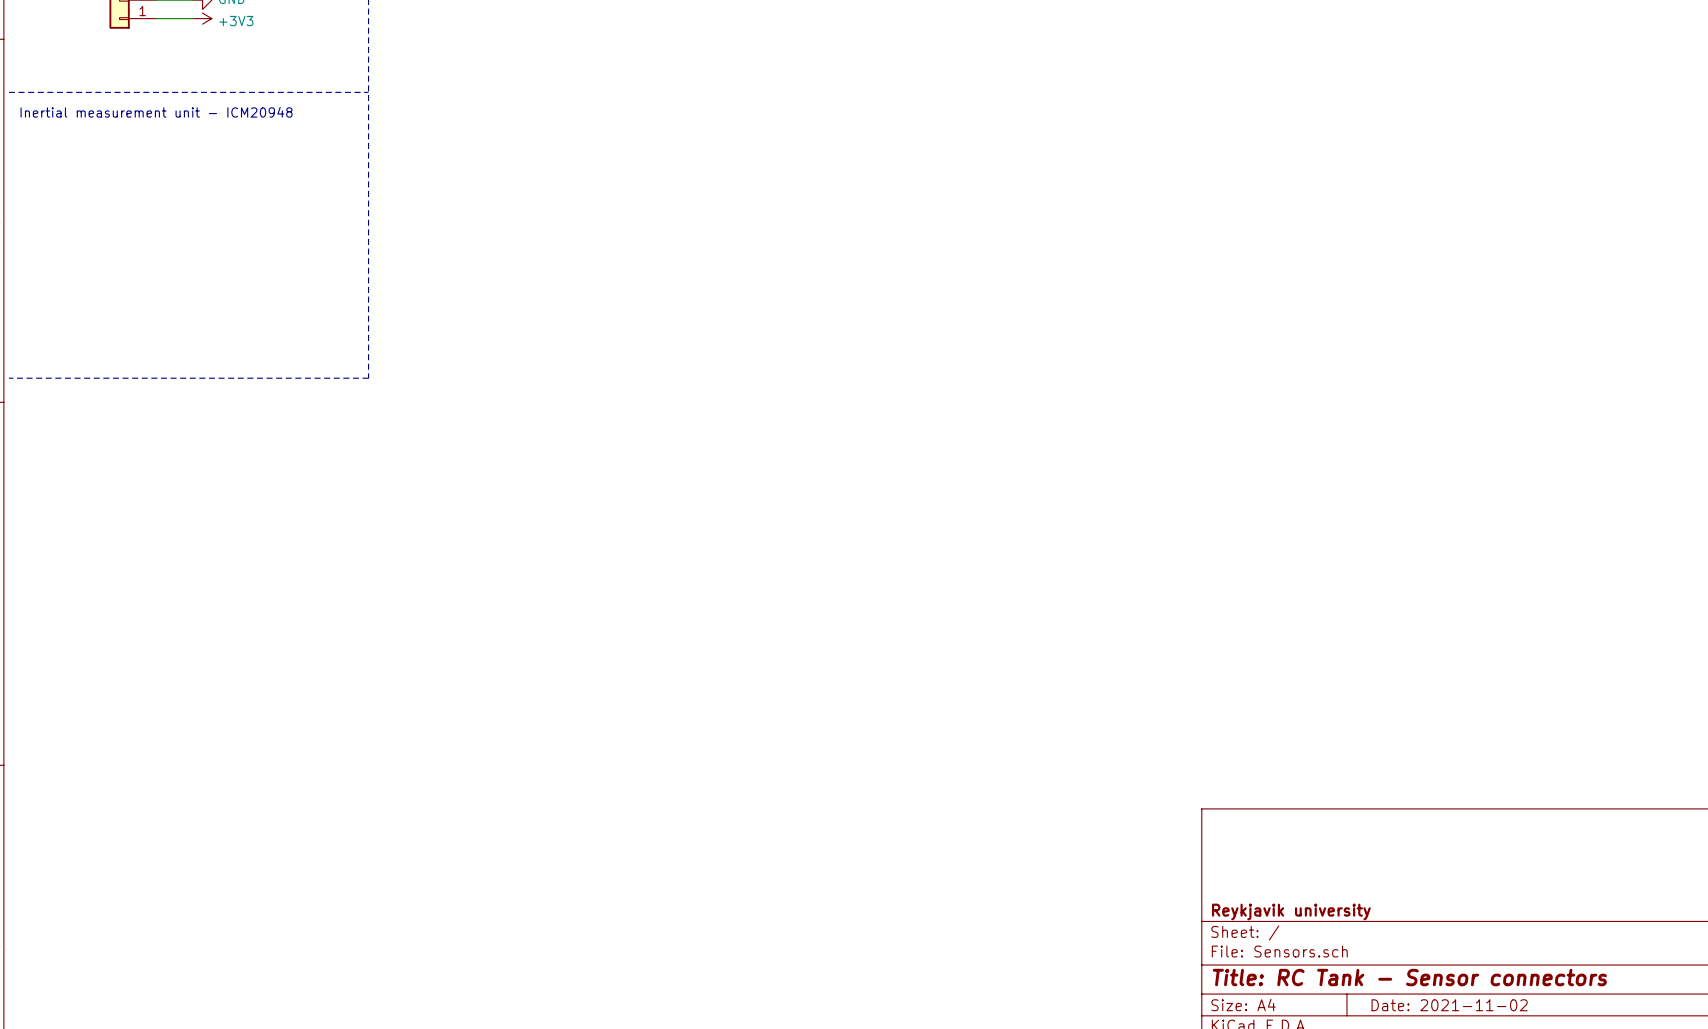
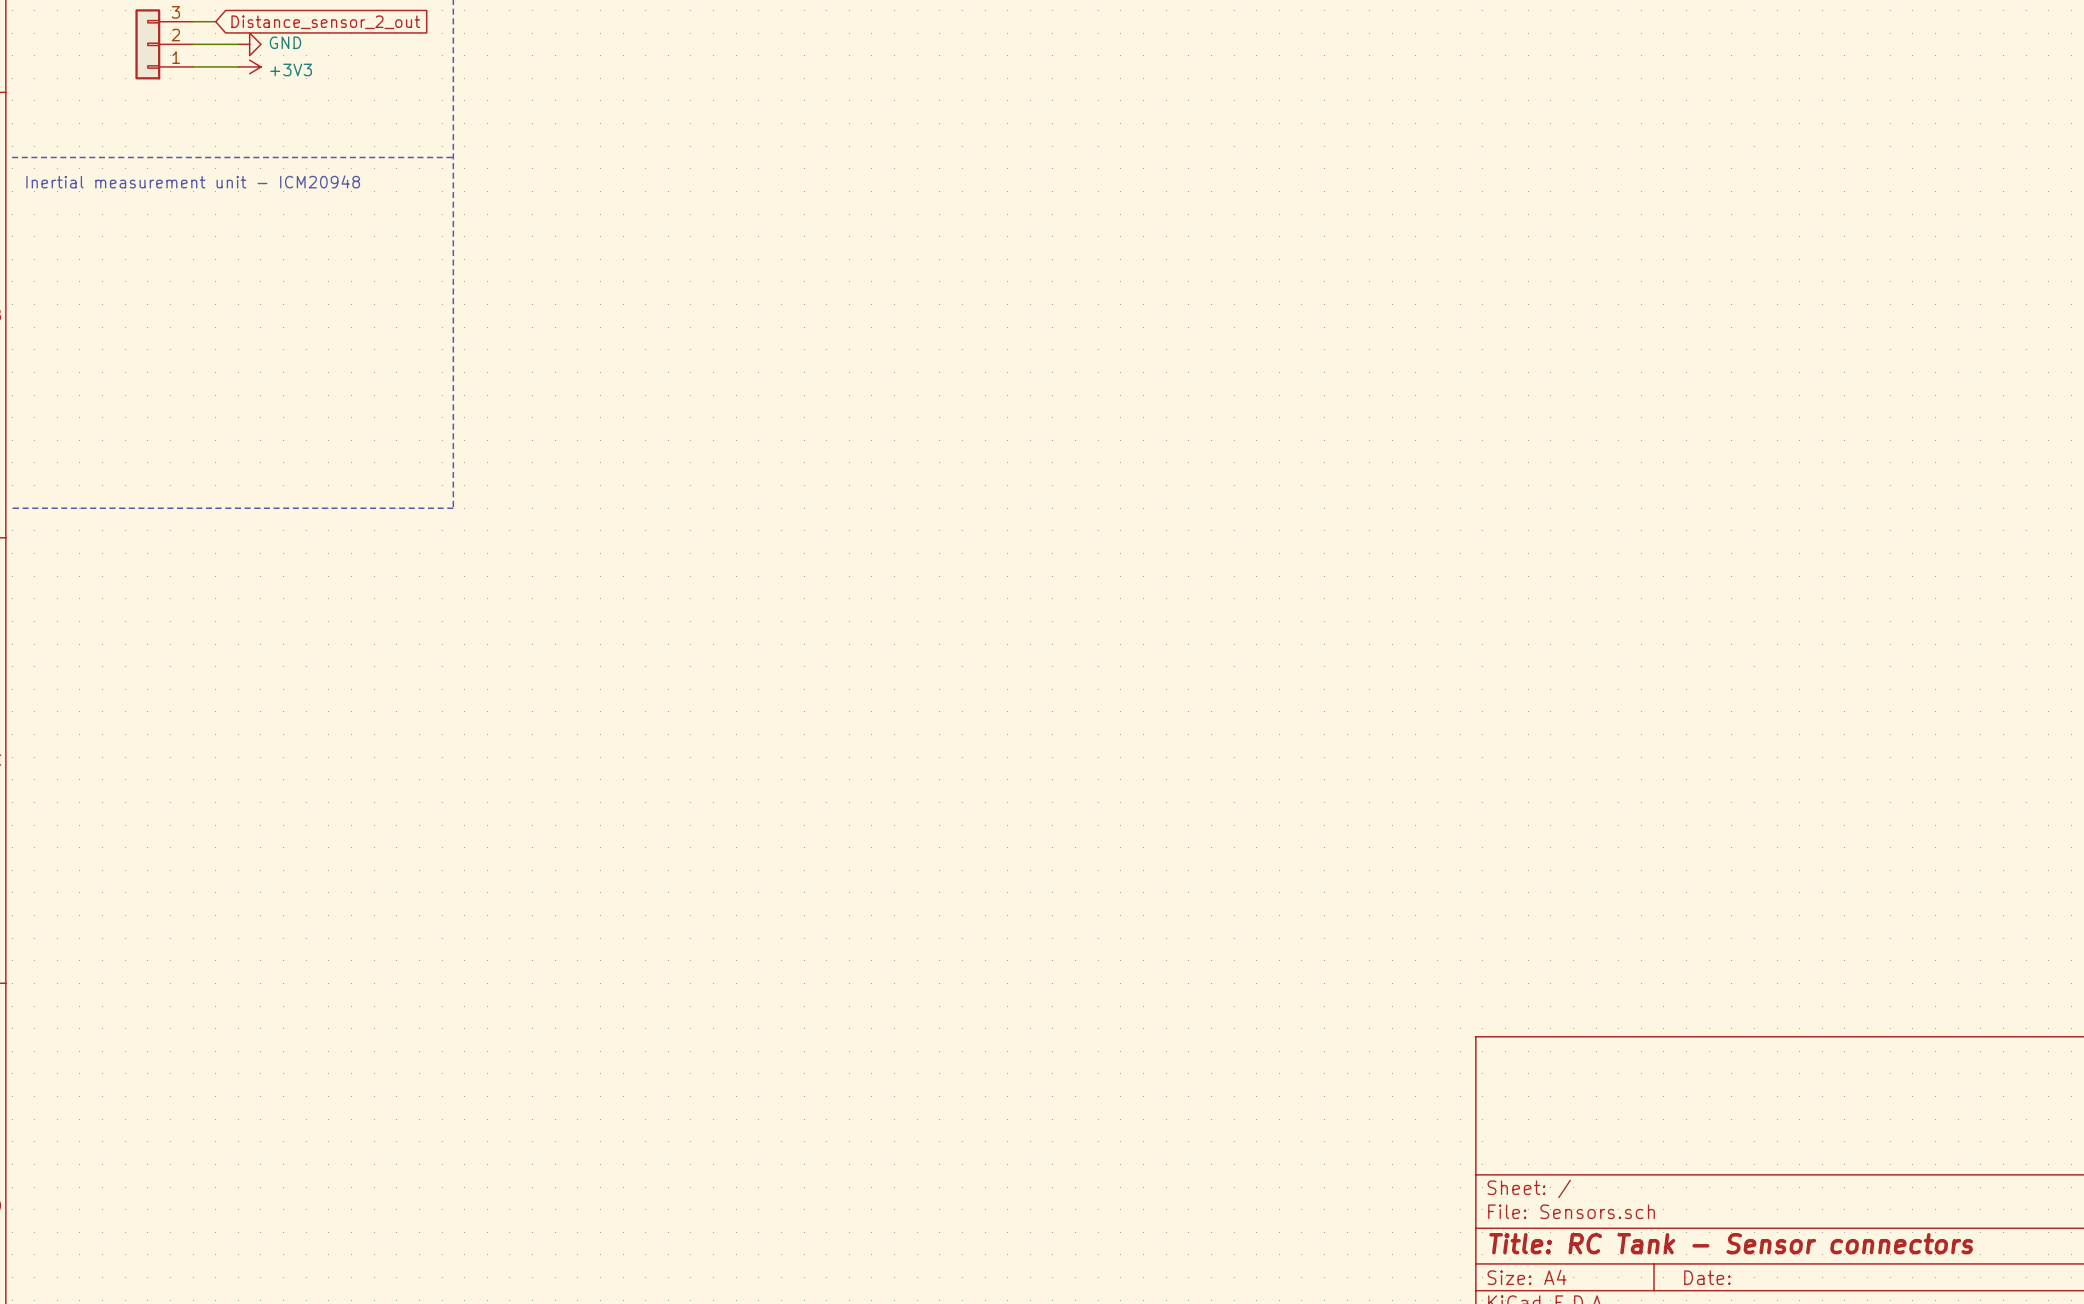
title block: Reykjavik university (1291, 911) -> none
title block: Date: 2021-11-02 (1449, 1005) -> Date: (1707, 1277)

